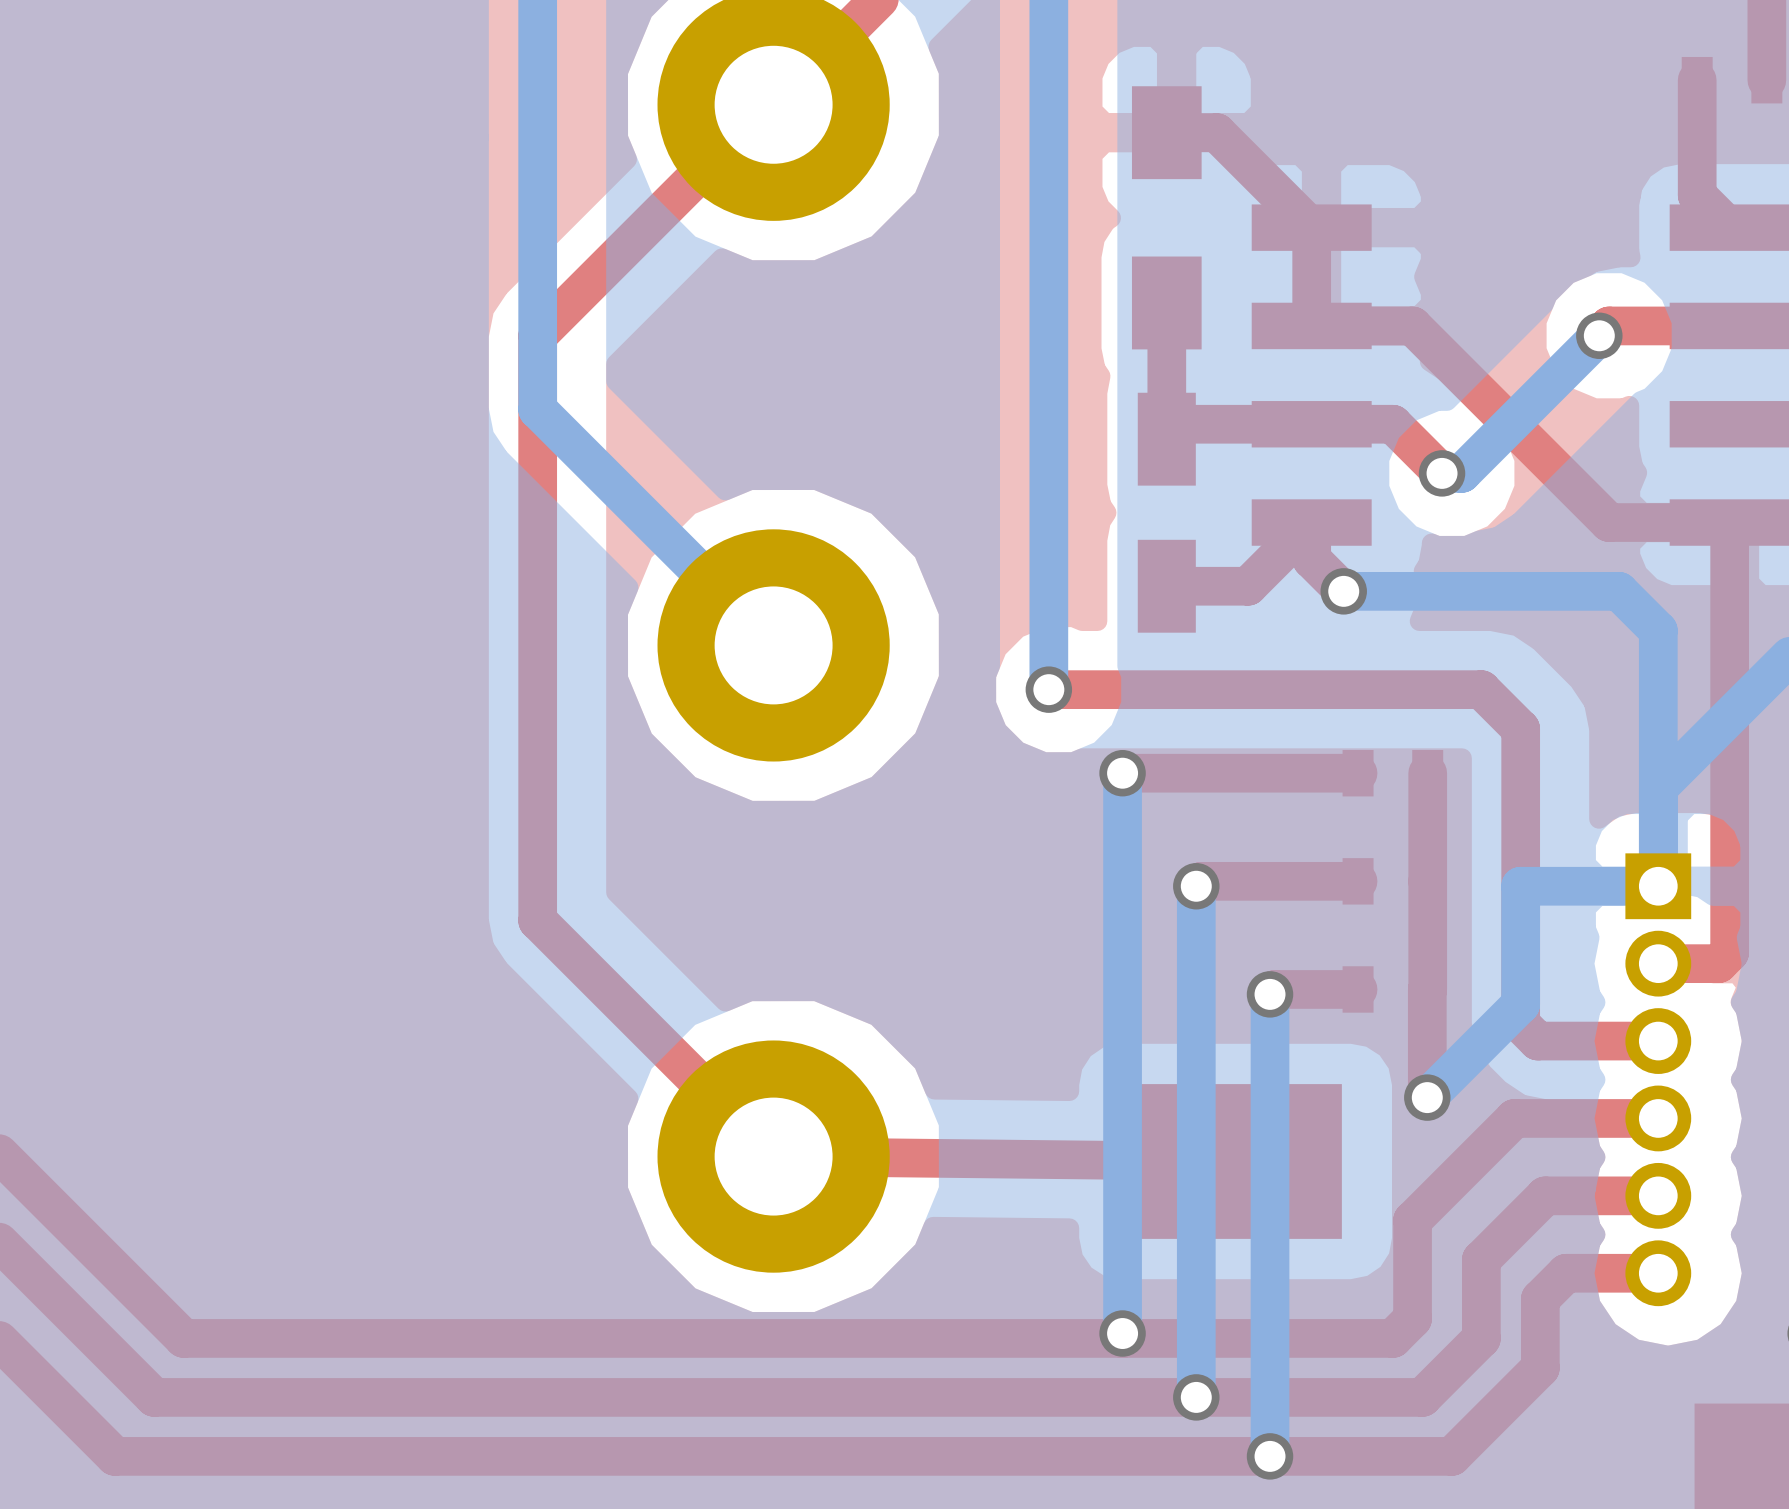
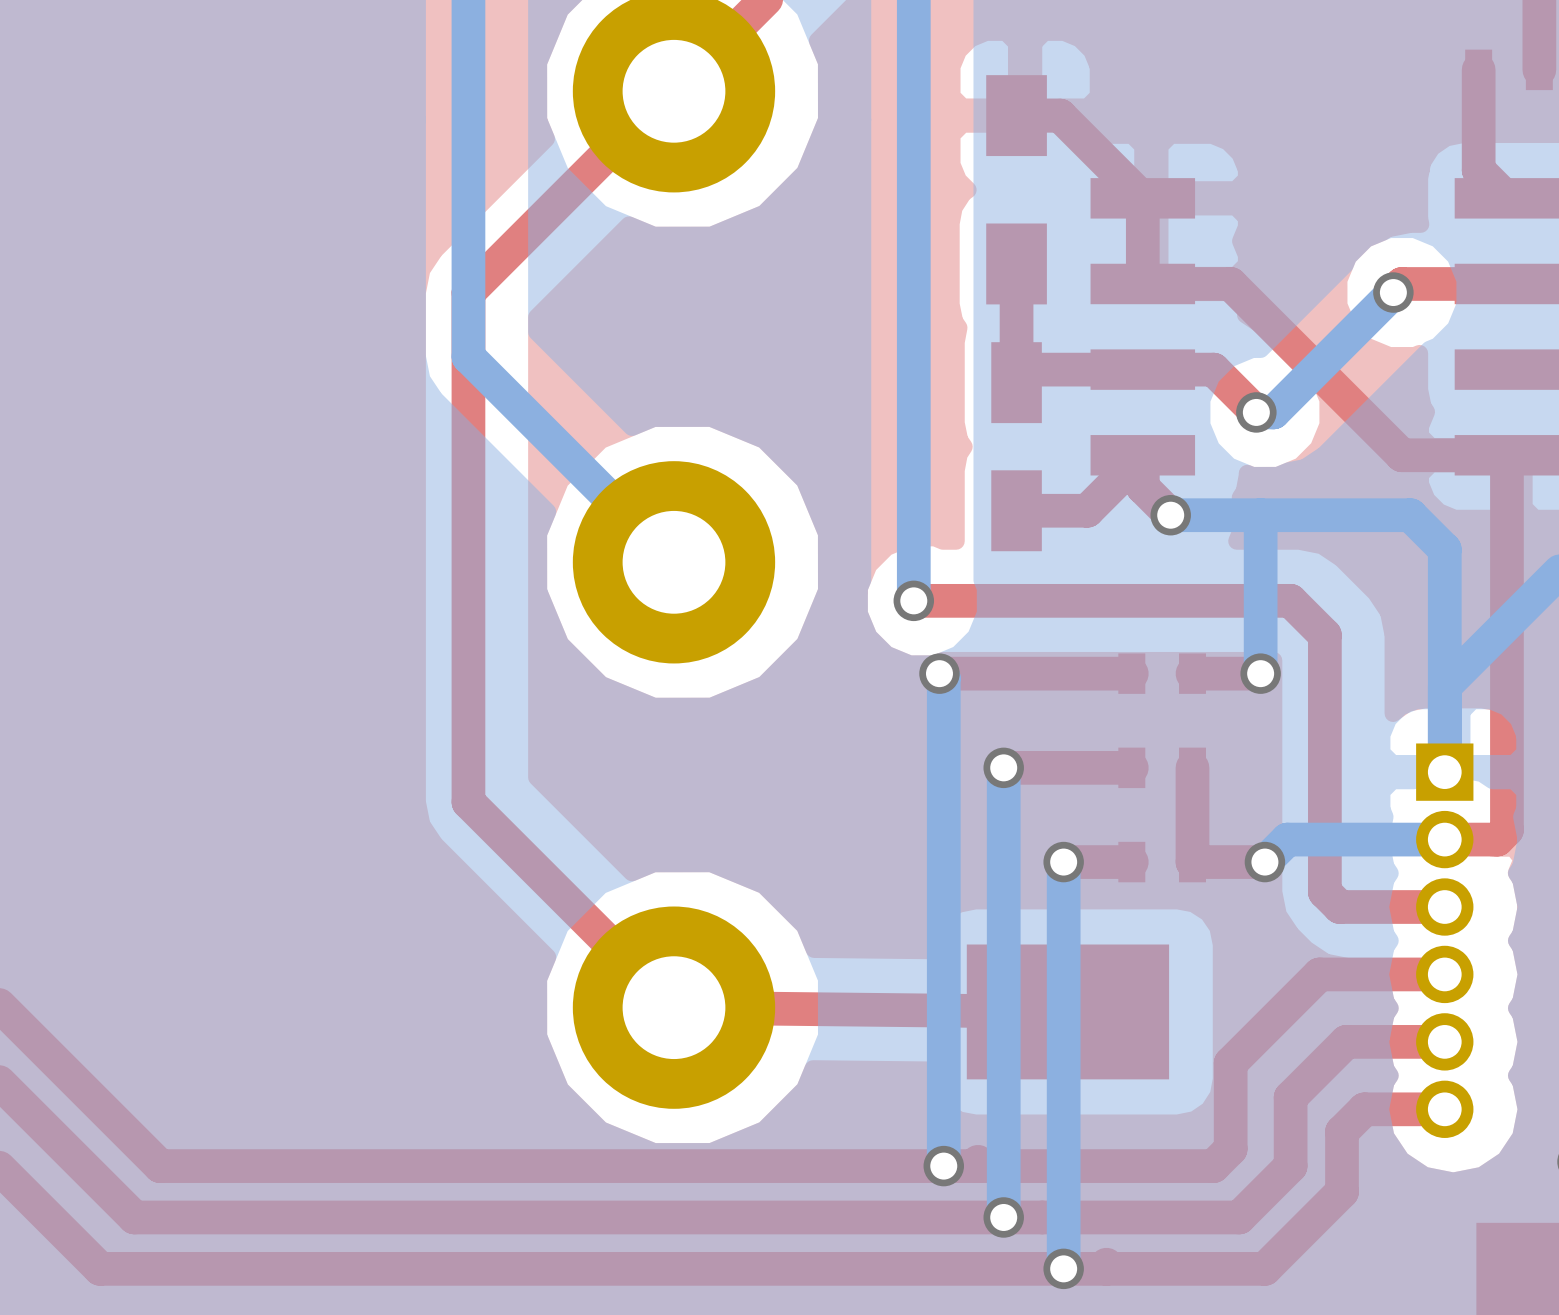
bottom track: none -> (1260, 515) (1260, 673)
bottom track: none -> (939, 673) (943, 677) (943, 1166)
bottom track: (1122, 773) (1122, 1333) -> none
via position: (1122, 773) -> (939, 673)
via: none -> (1260, 673)
bottom track: none -> (1003, 767) (1003, 1217)
bottom track: (1196, 886) (1196, 1397) -> none
via position: (1196, 886) -> (1003, 767)
bottom track: (1658, 886) (1520, 886) (1520, 1004) (1427, 1097) -> none
bottom track: none -> (1444, 839) (1287, 839) (1264, 862)
bottom track: none -> (1063, 862) (1063, 1268)
via: none -> (1264, 862)
bottom track: (1270, 994) (1270, 1456) -> none
via position: (1270, 994) -> (1063, 862)
via: (1427, 1097) -> none
via position: (1122, 1333) -> (943, 1166)
via position: (1196, 1397) -> (1003, 1217)
via: none -> (1063, 1268)
via: (1270, 1456) -> none

